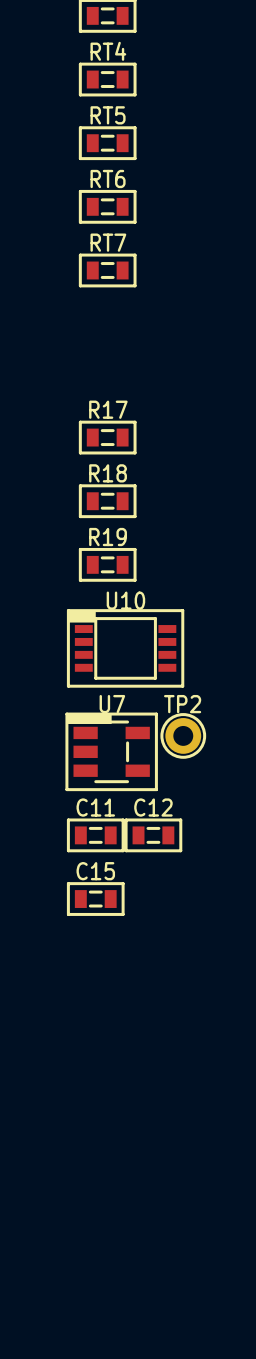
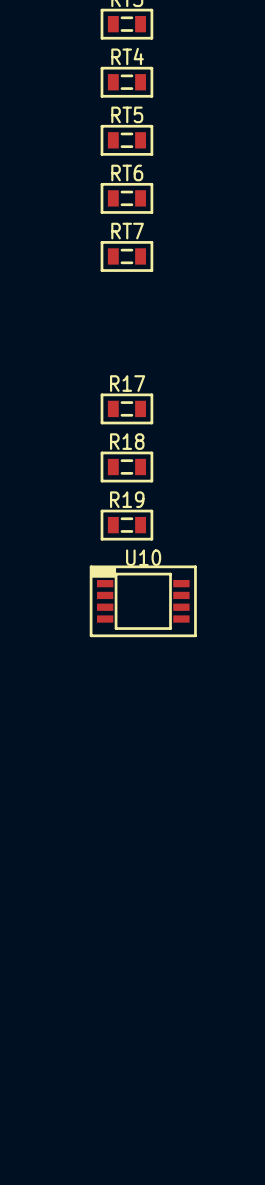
TP2: (183, 735) -> none
U7: (111, 751) -> none
C11: (95, 835) -> none
C12: (153, 835) -> none
C15: (95, 899) -> none

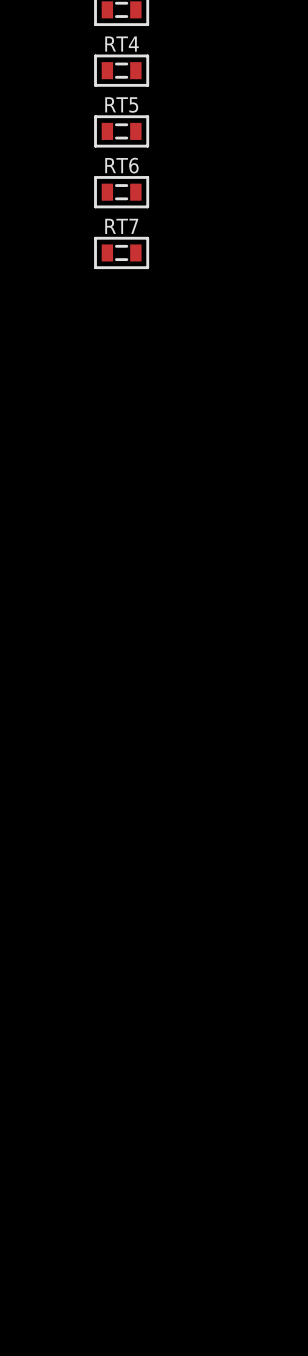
R17: (126, 408) -> none
R18: (126, 467) -> none
R19: (126, 525) -> none
U10: (143, 601) -> none

